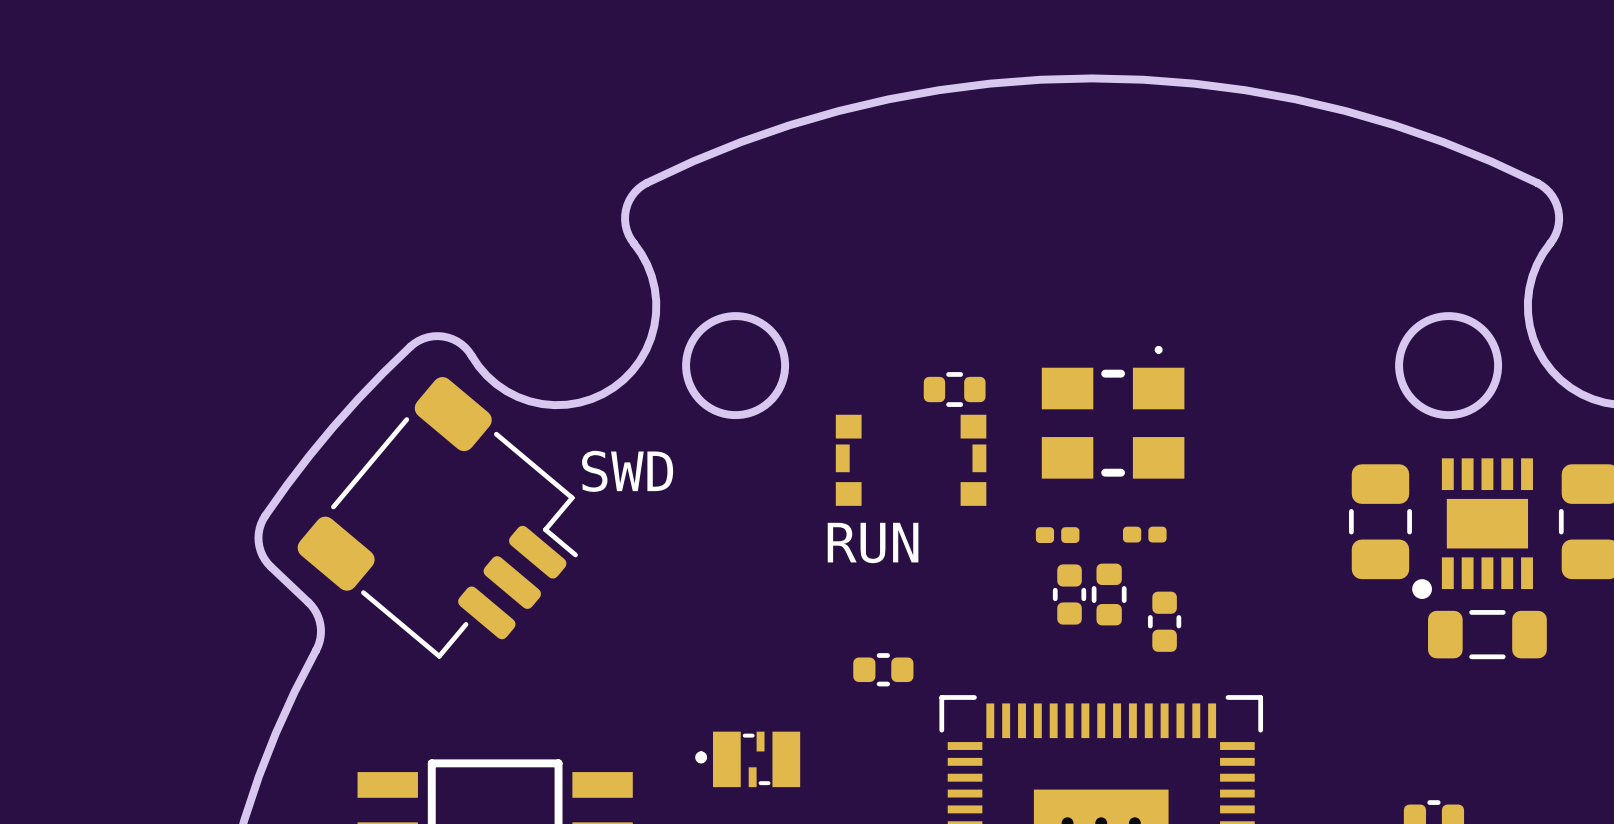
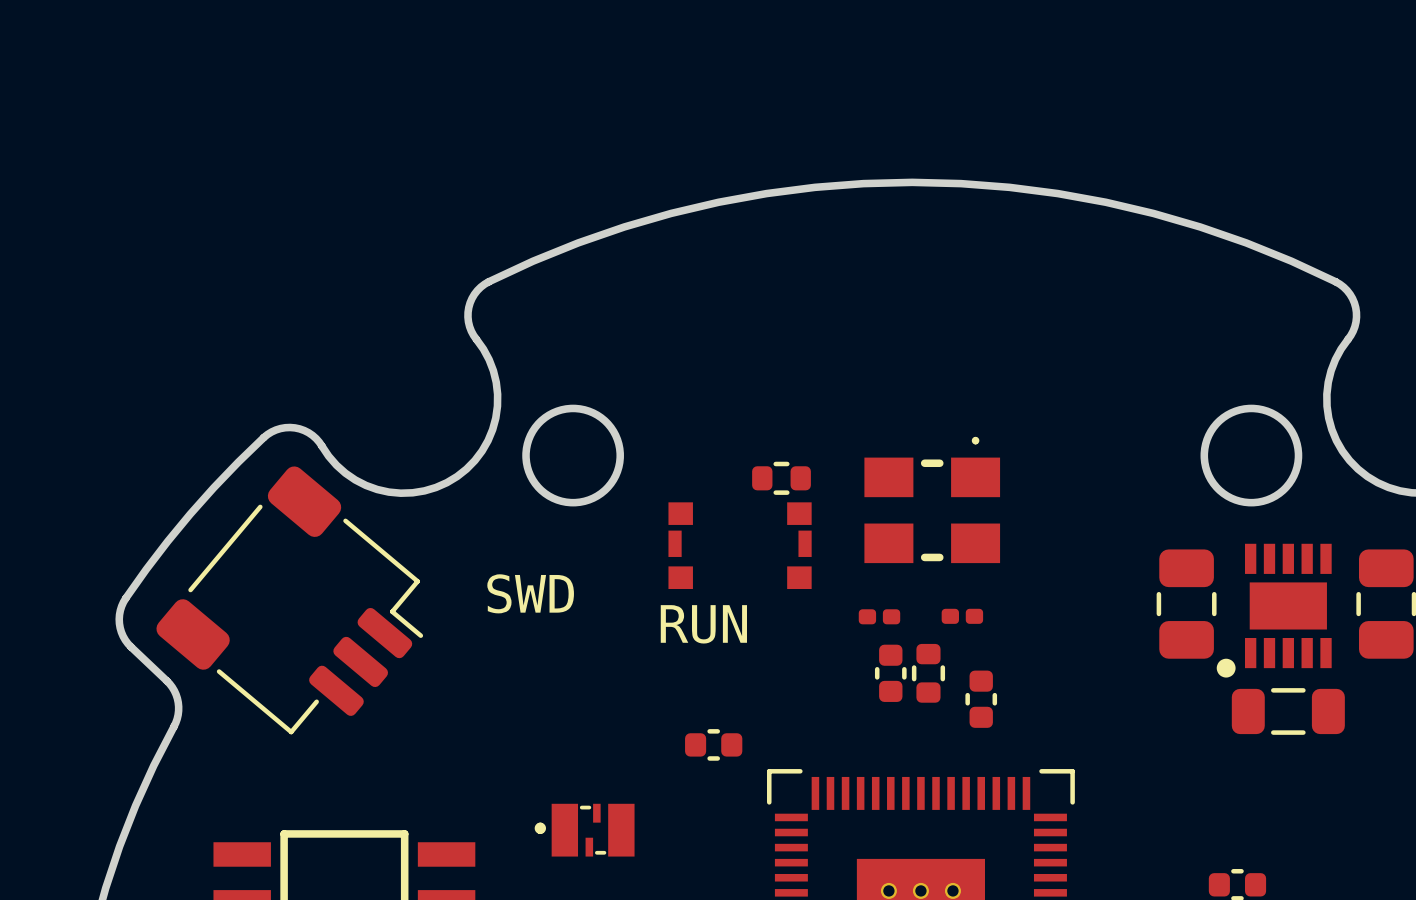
text position: SWD (627, 471) -> SWD (530, 593)

